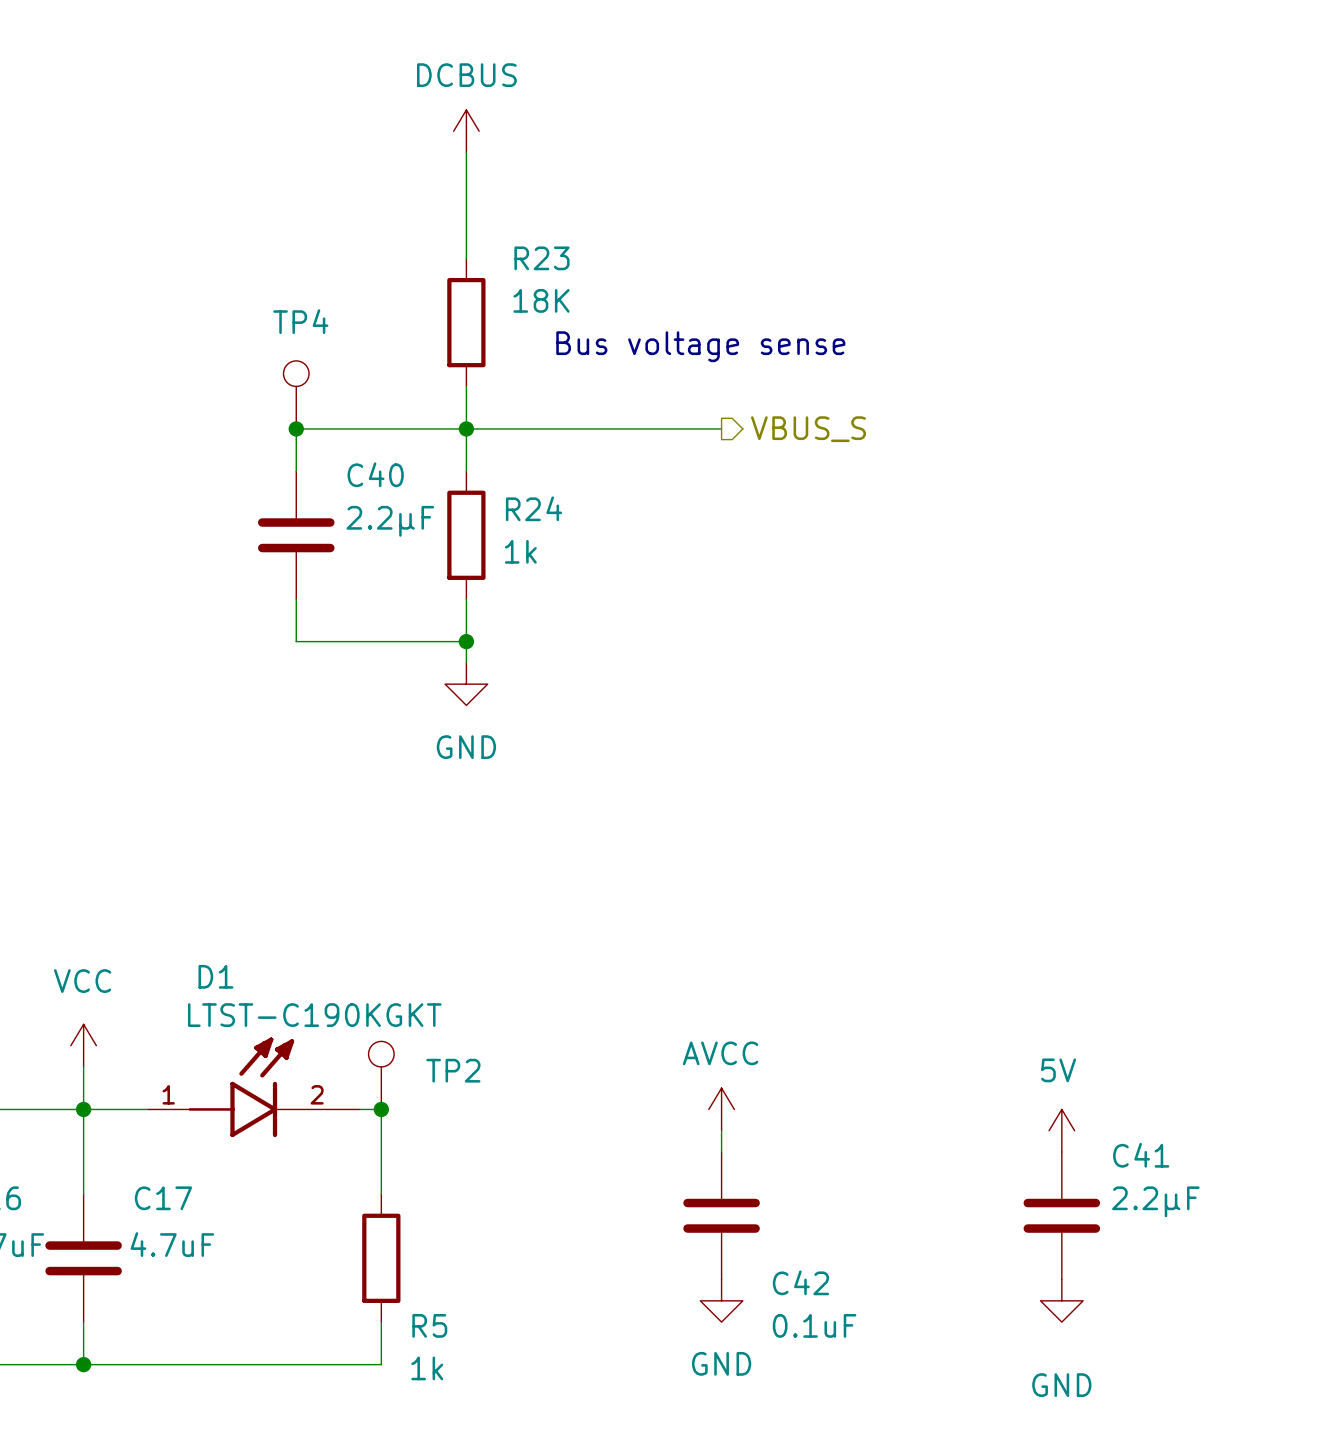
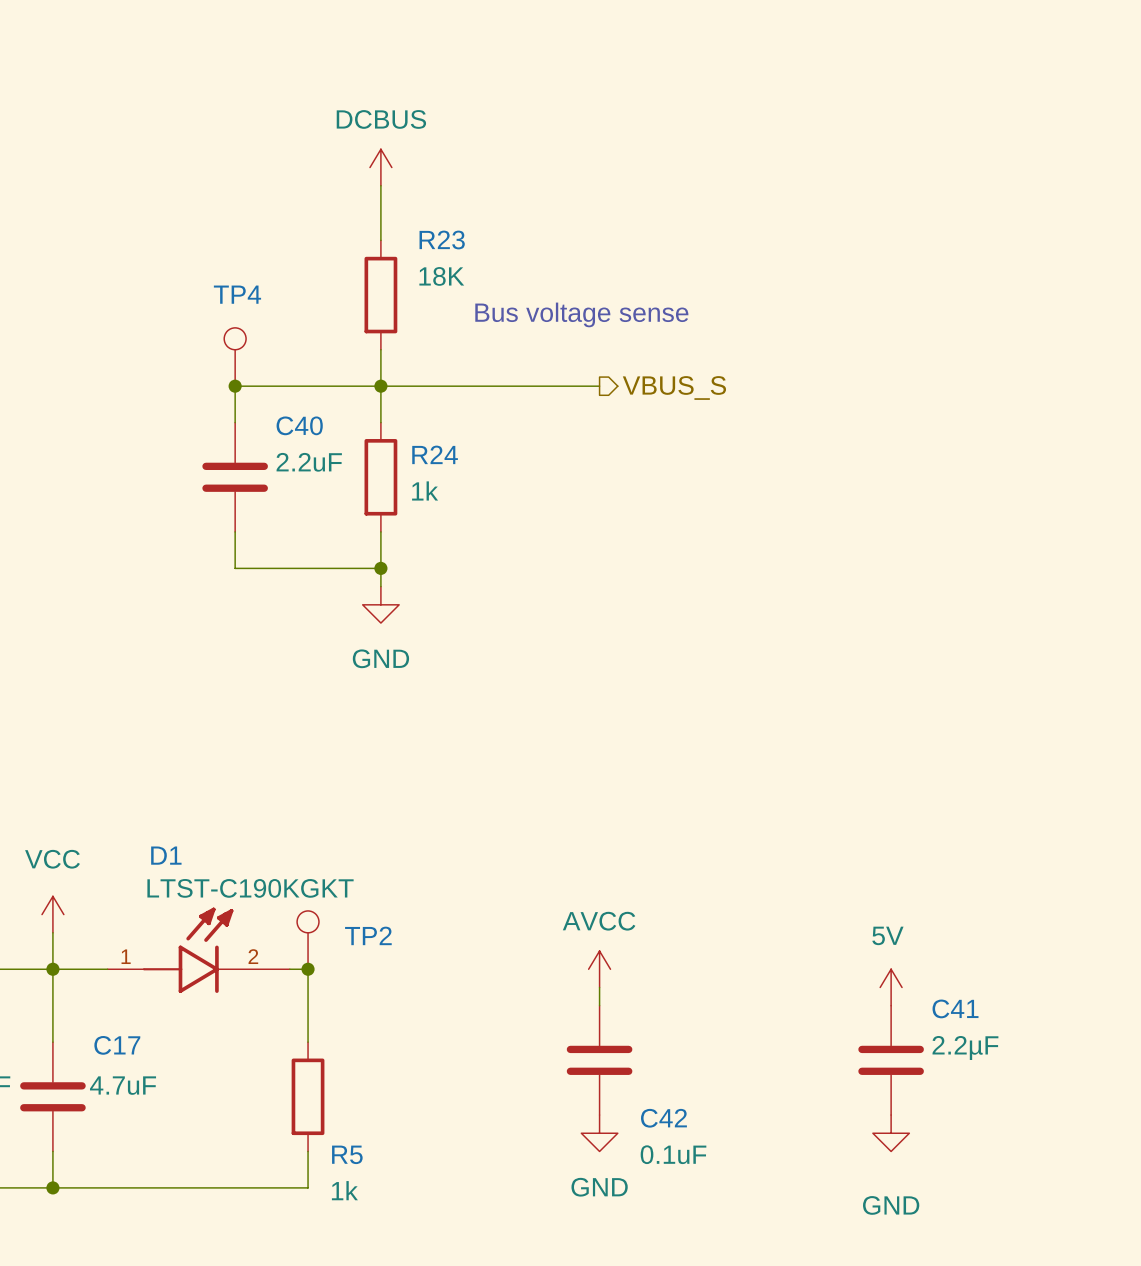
power symbol position: DCBUS (466, 131) -> DCBUS (380, 167)
C40 value: 2.2µF (390, 521) -> 2.2uF (309, 462)

